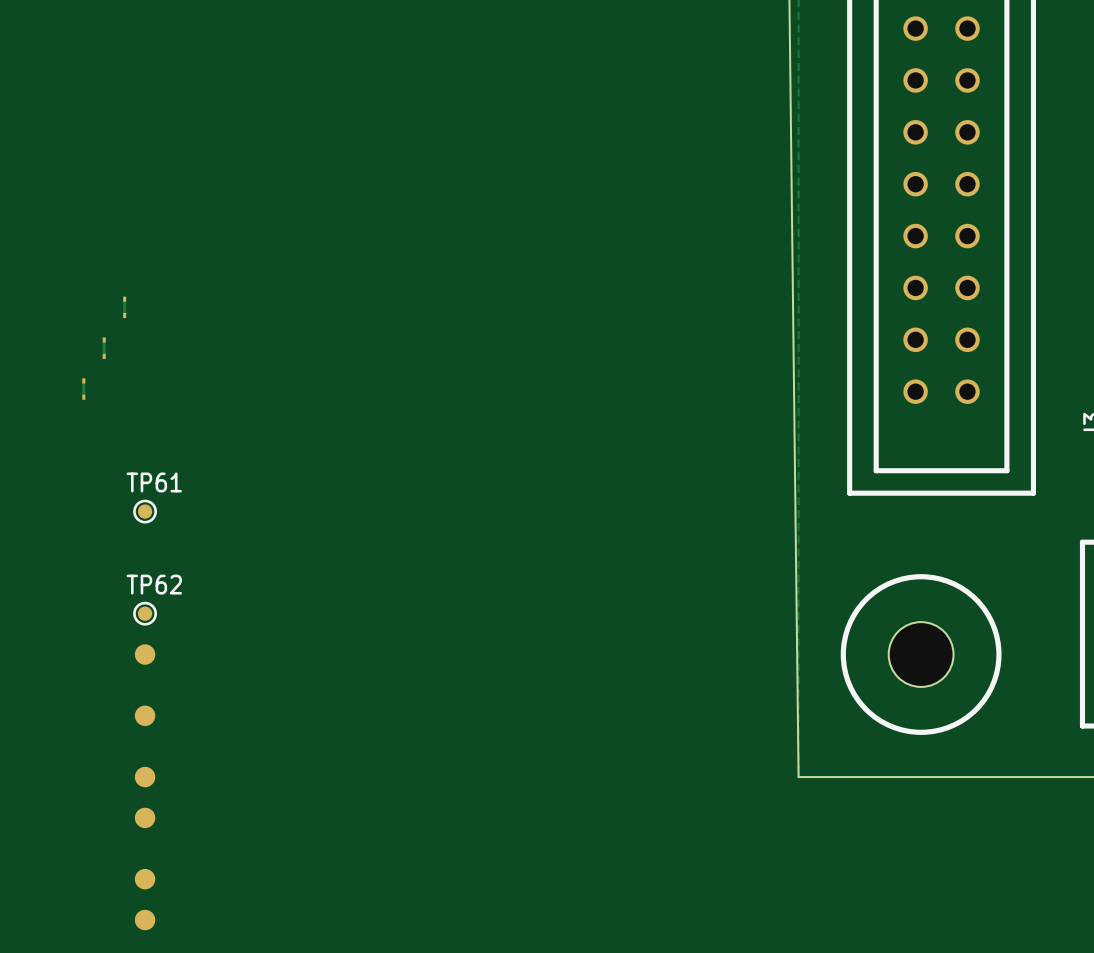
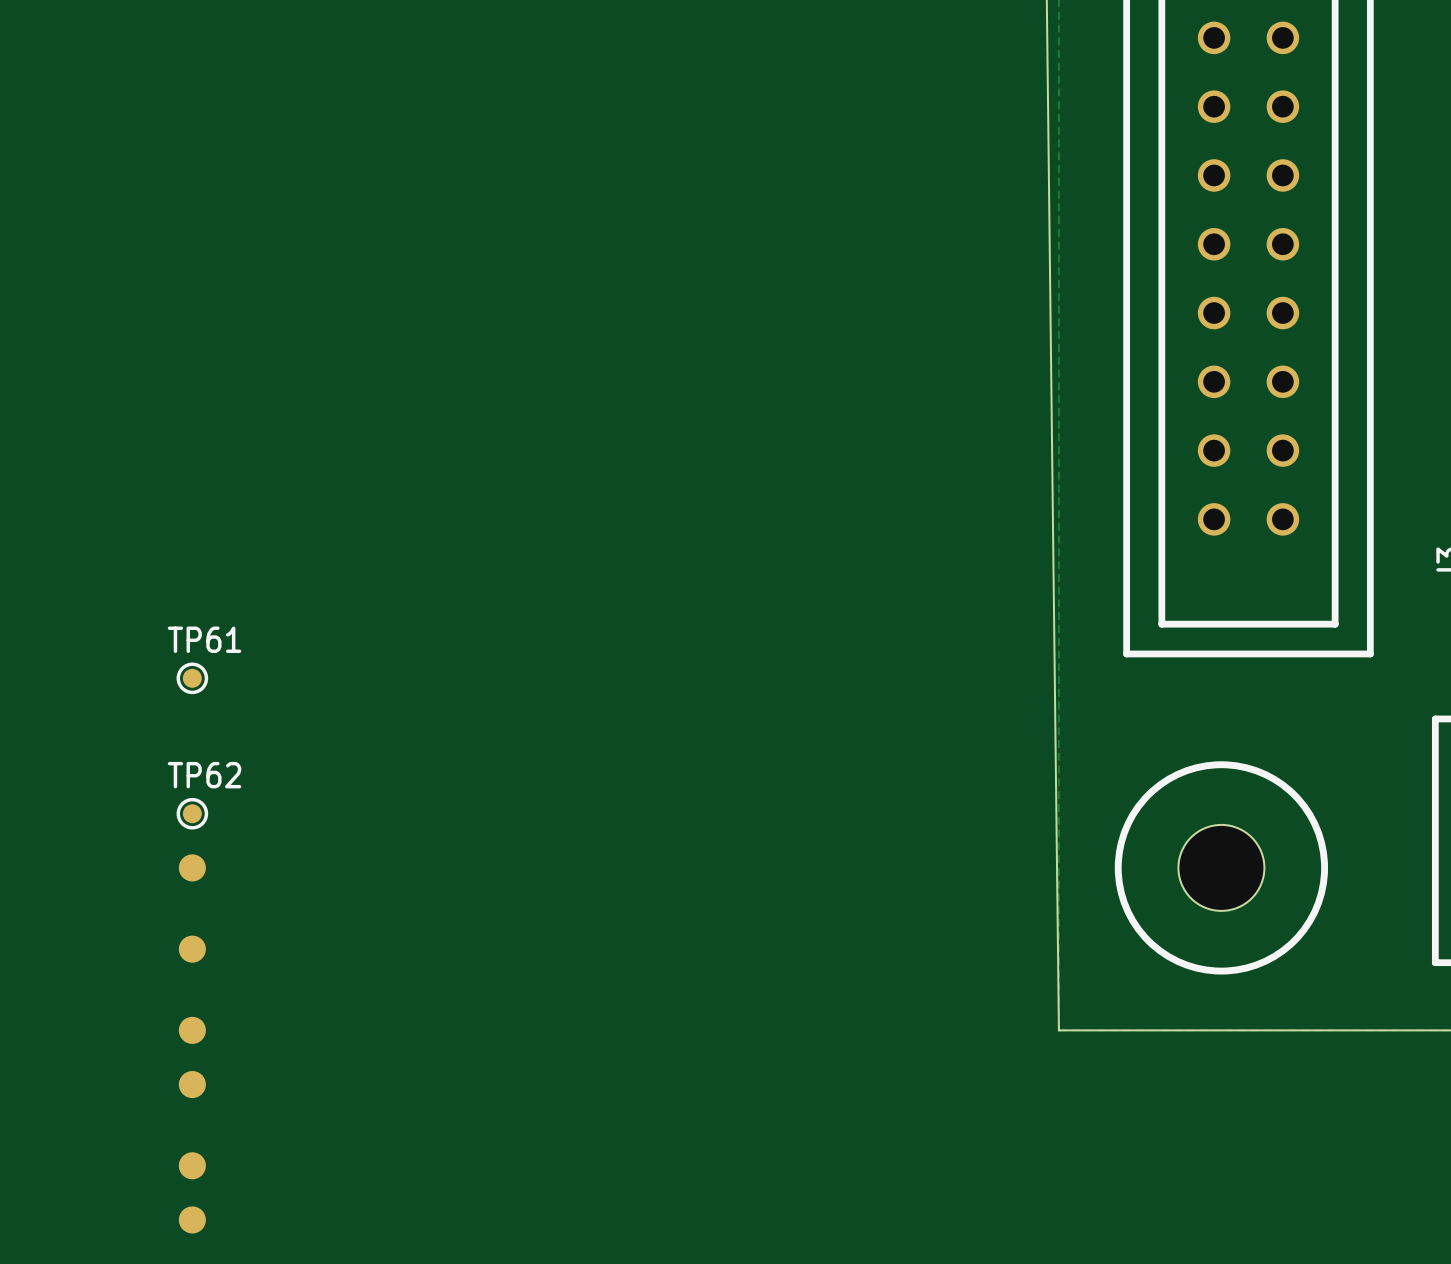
part: (124, 307) -> none
part: (104, 348) -> none
part: (83, 389) -> none

